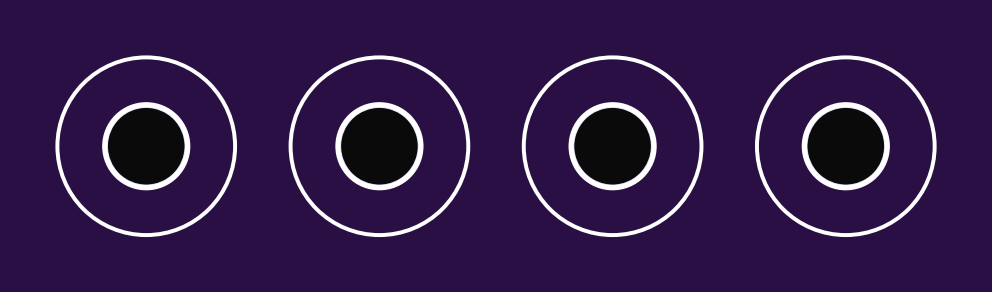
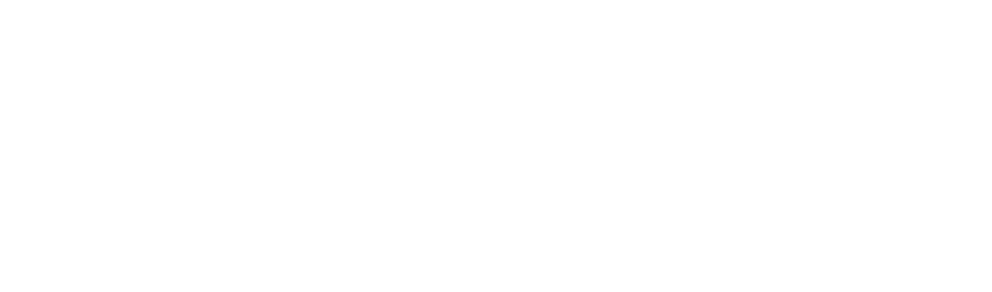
part: (146, 146) -> none
part: (379, 146) -> none
part: (612, 146) -> none
part: (845, 146) -> none

